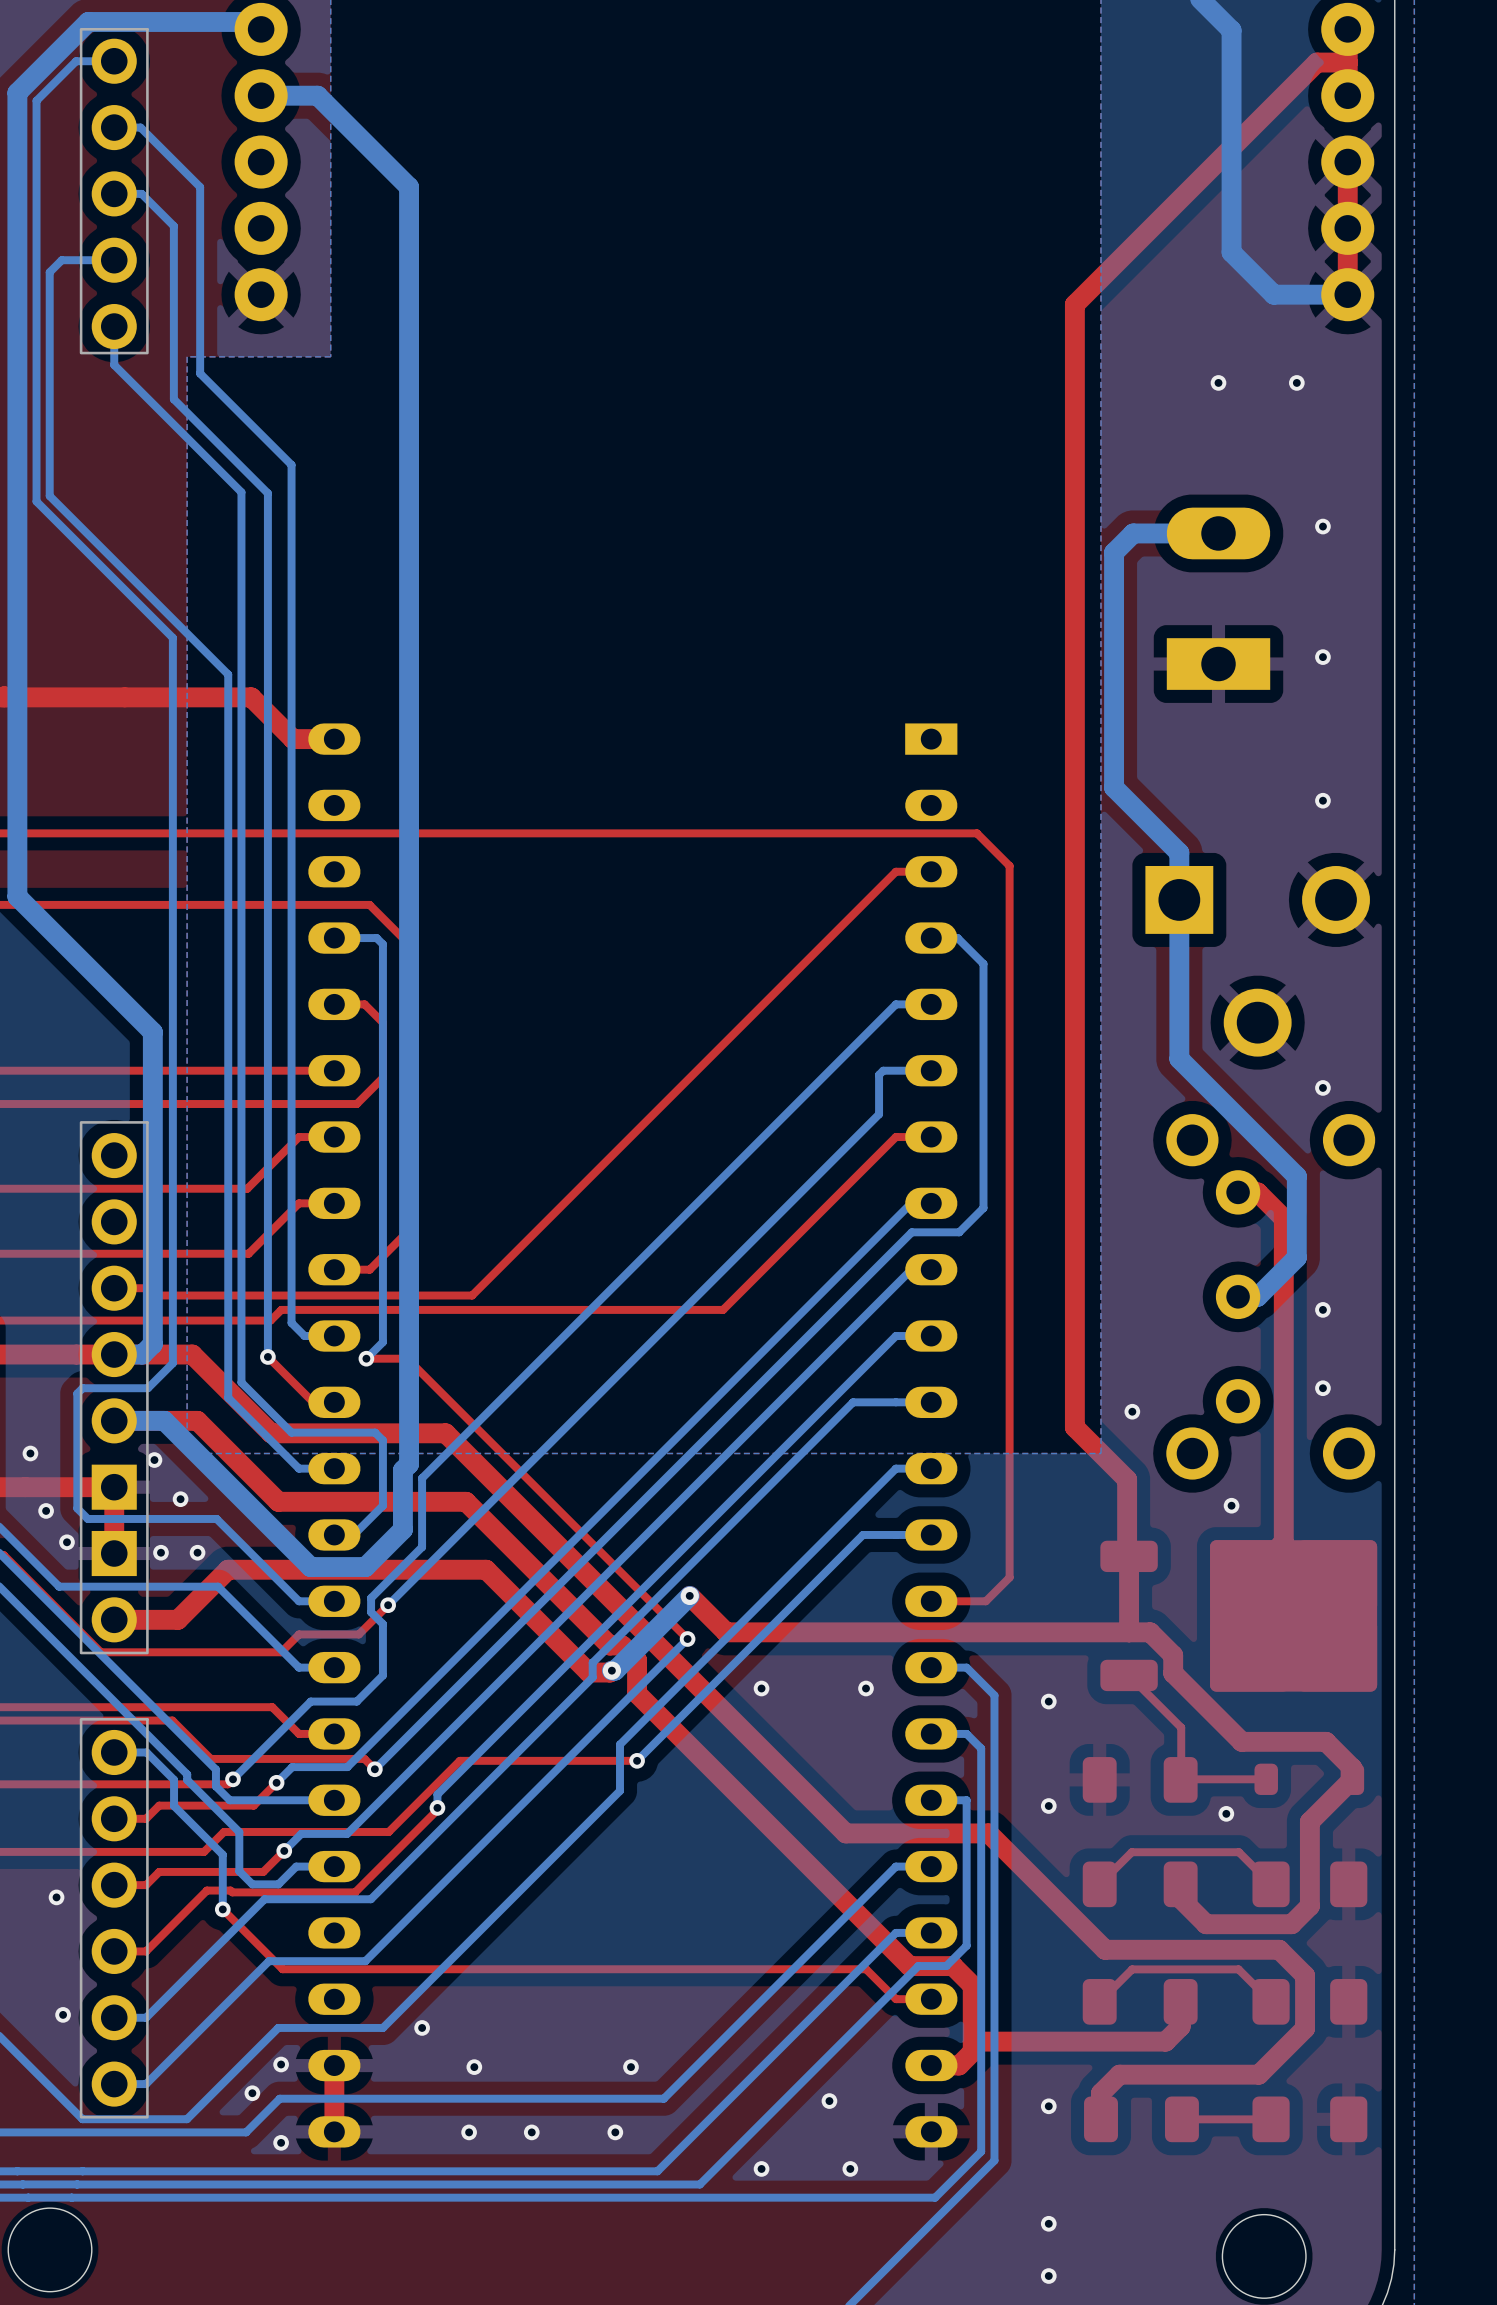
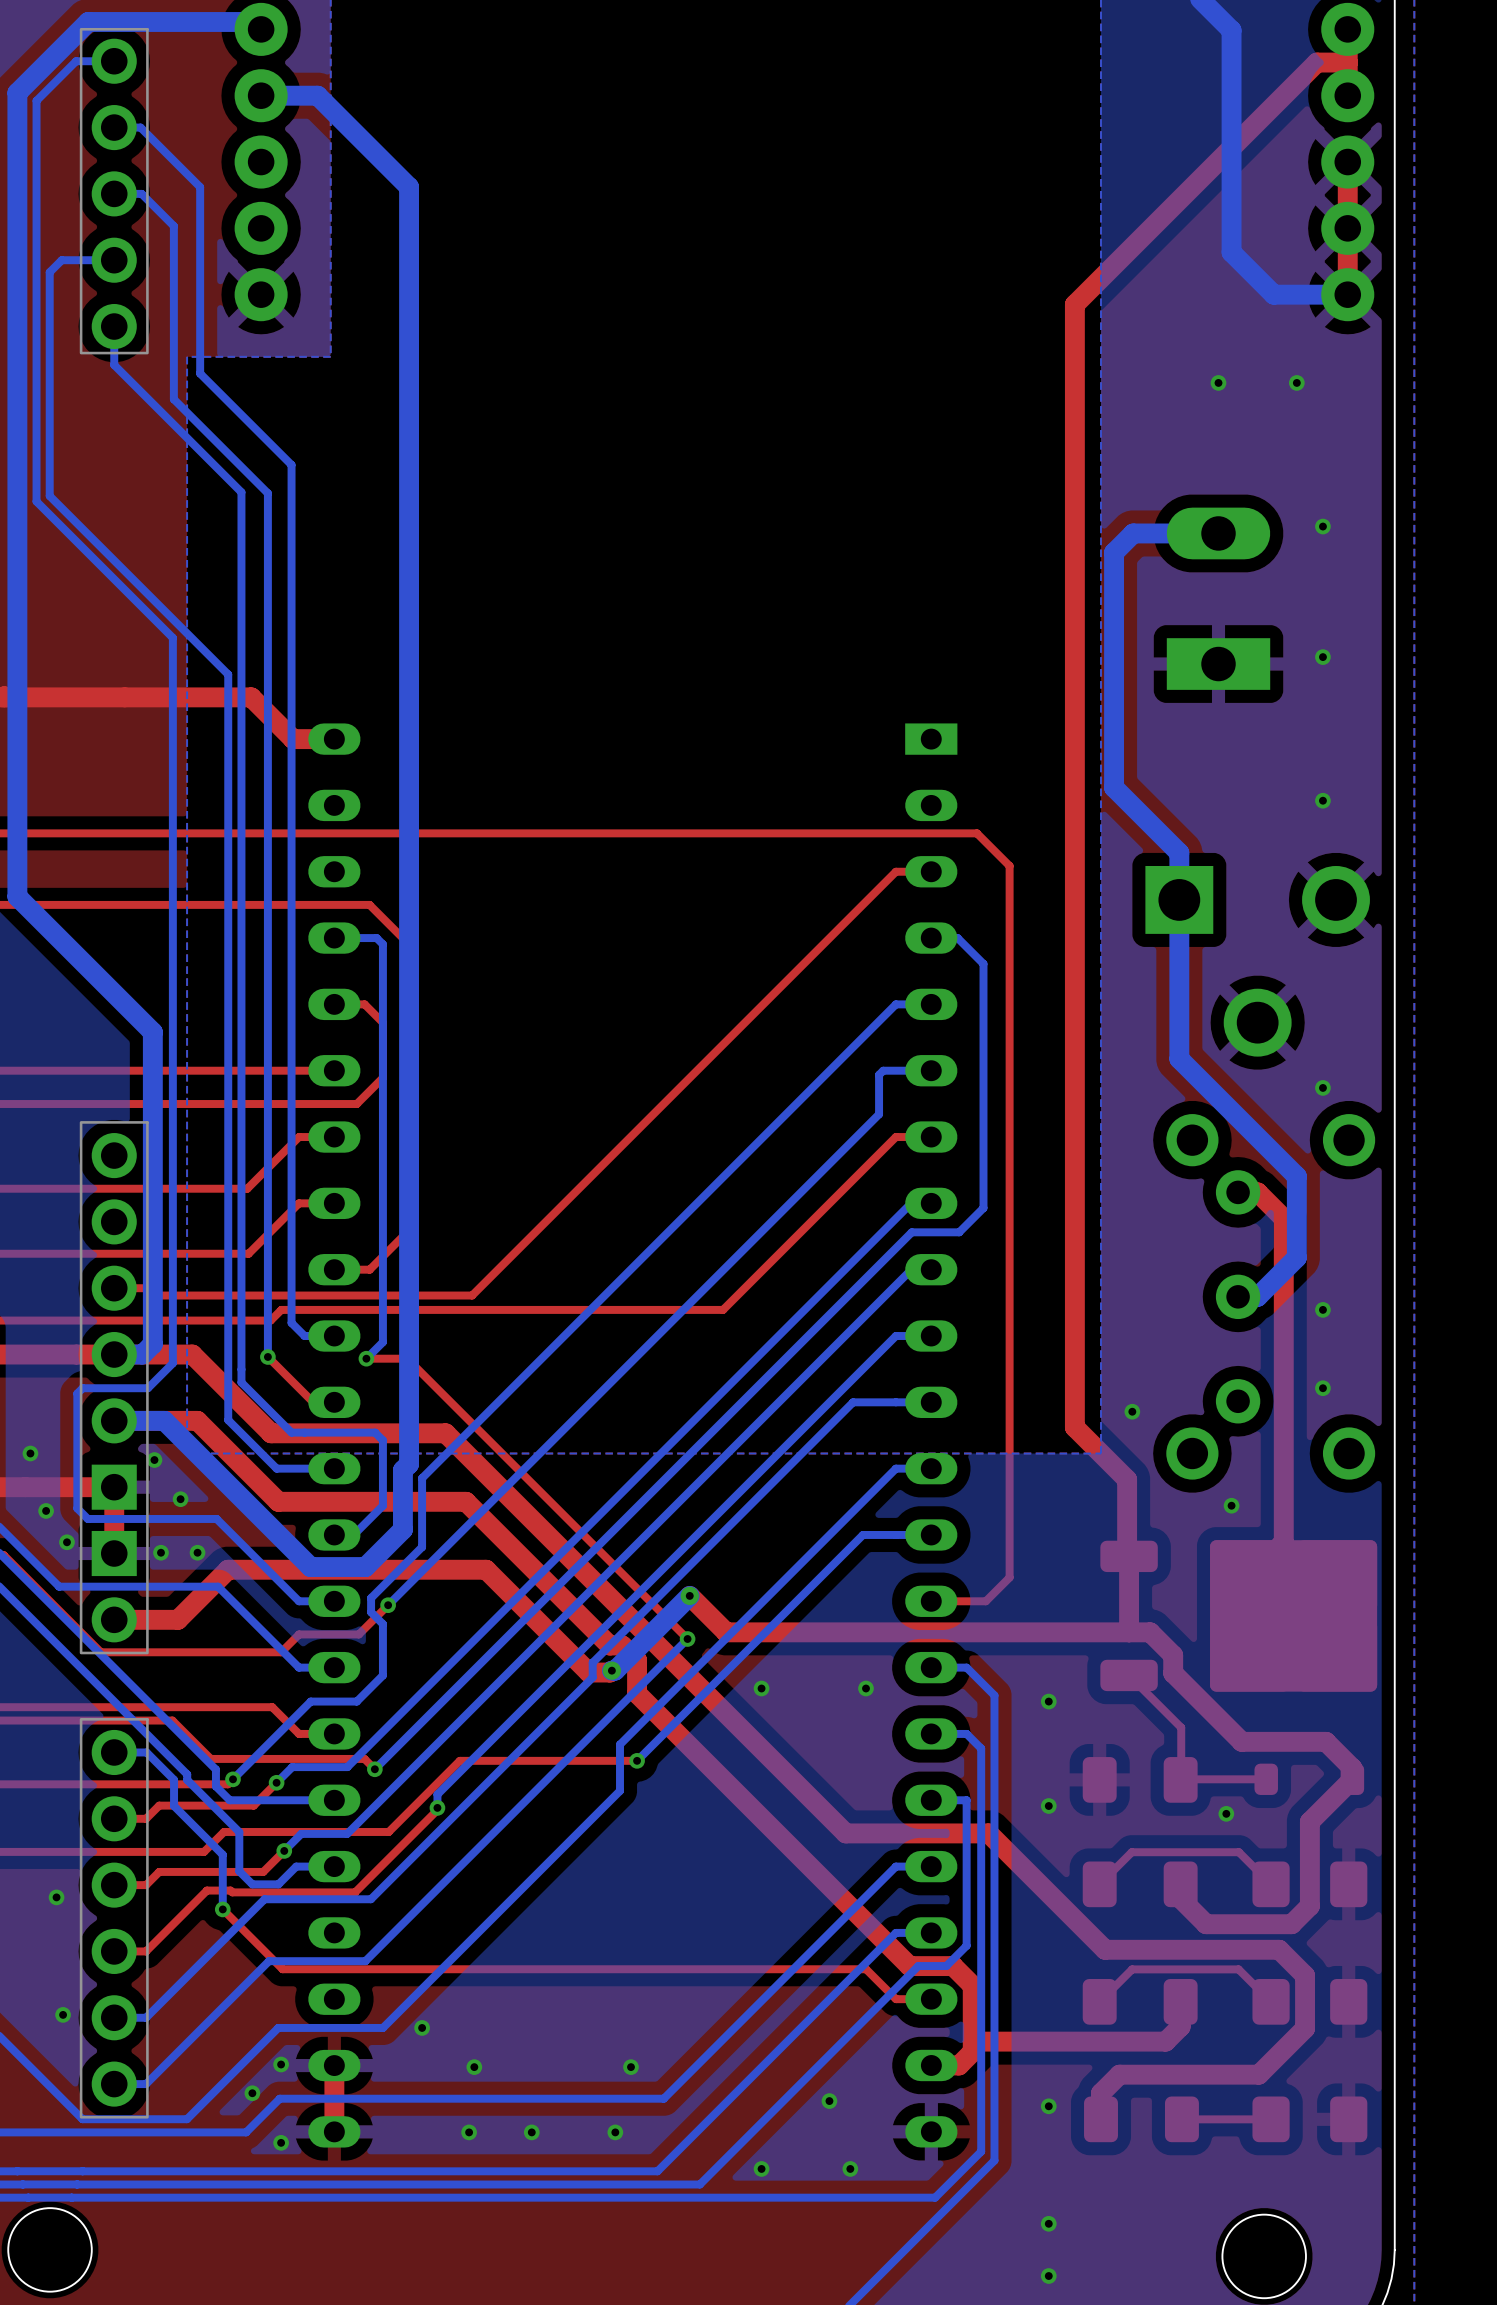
bottom track: (228, 1397) (299, 1468) -> (228, 1397) (228, 1420) (276, 1468) (299, 1468)

